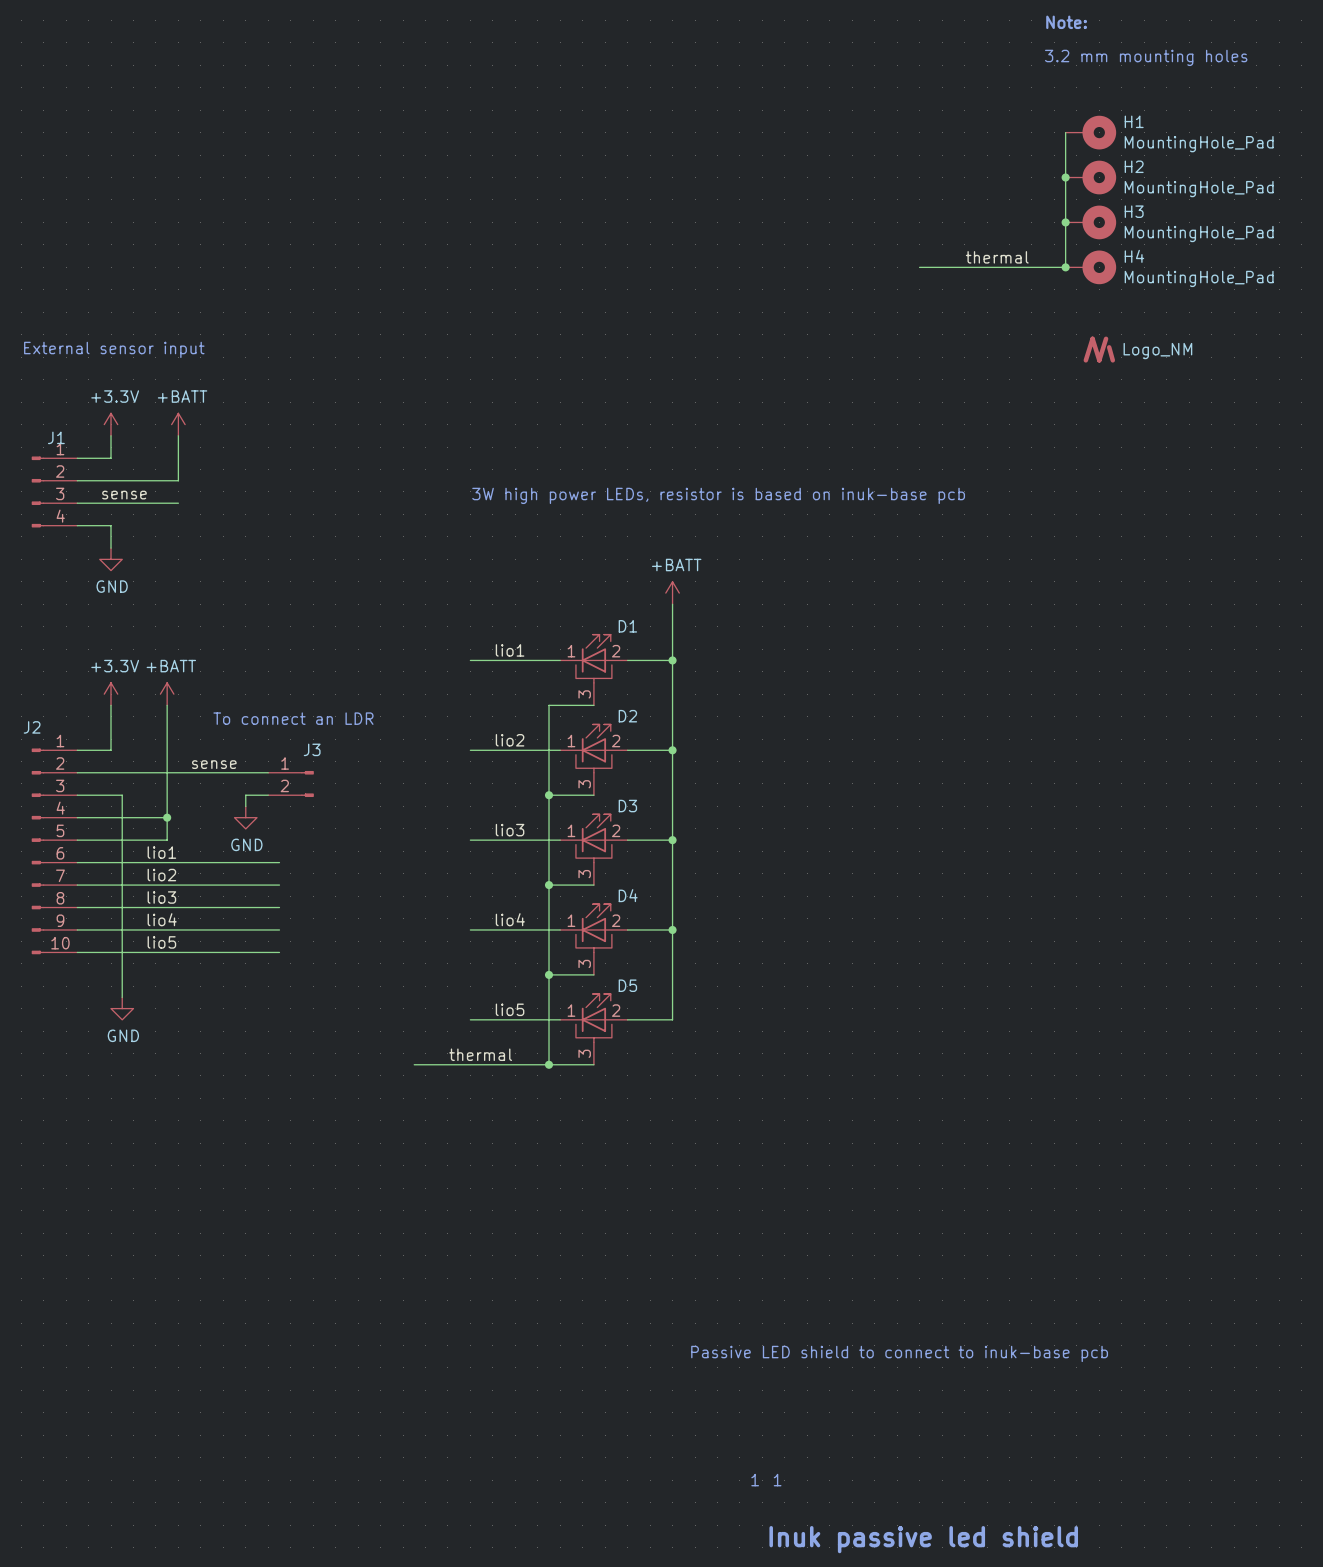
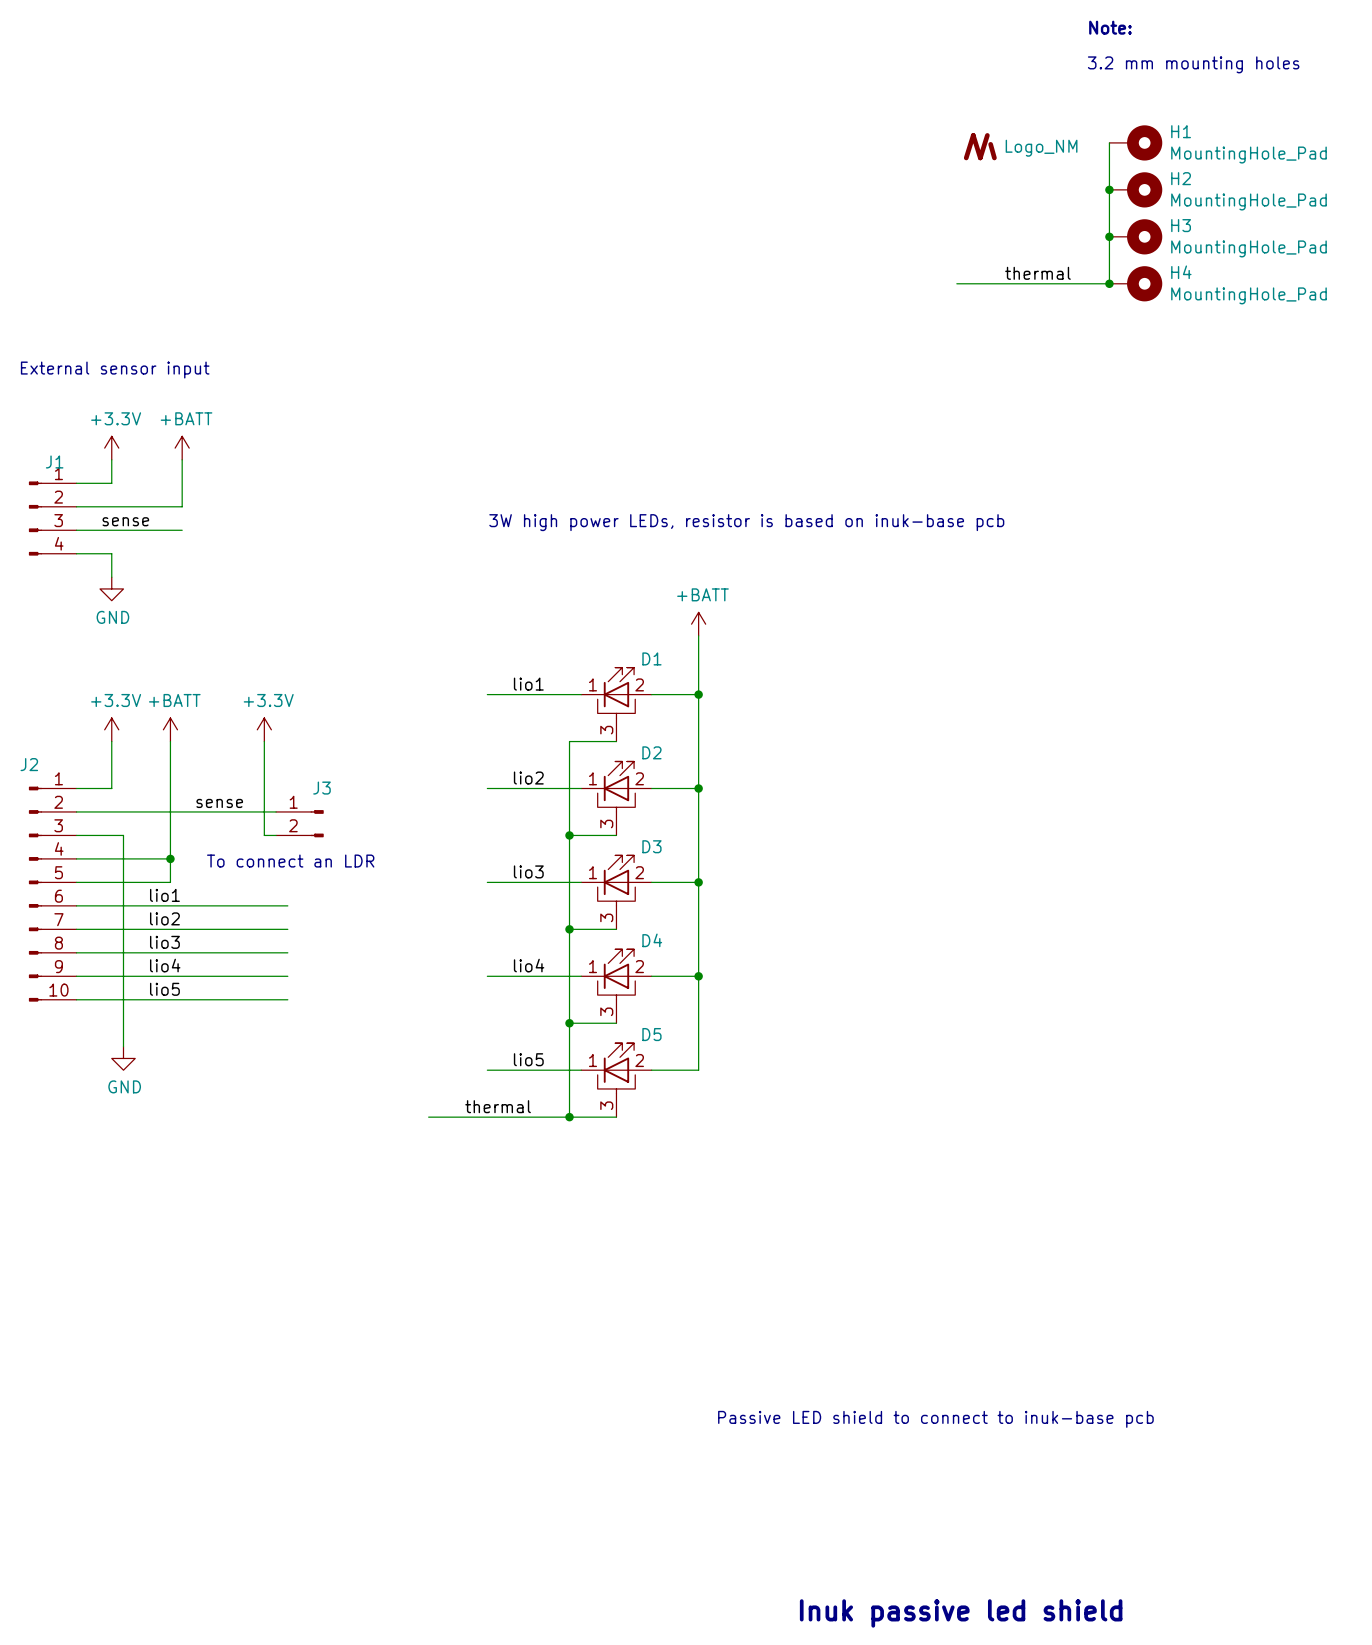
part: none -> Logo_NM (980, 146)
part: Logo_NM (1099, 349) -> none
power symbol: none -> +3.3V (264, 729)
text position: To connect an LDR (293, 718) -> To connect an LDR (290, 861)
wire: (257, 795) (245, 795) (245, 806) -> (264, 835) (264, 741)
power symbol: GND (245, 817) -> none
text: 1 (755, 1480) -> none
text: 1 (777, 1480) -> none

